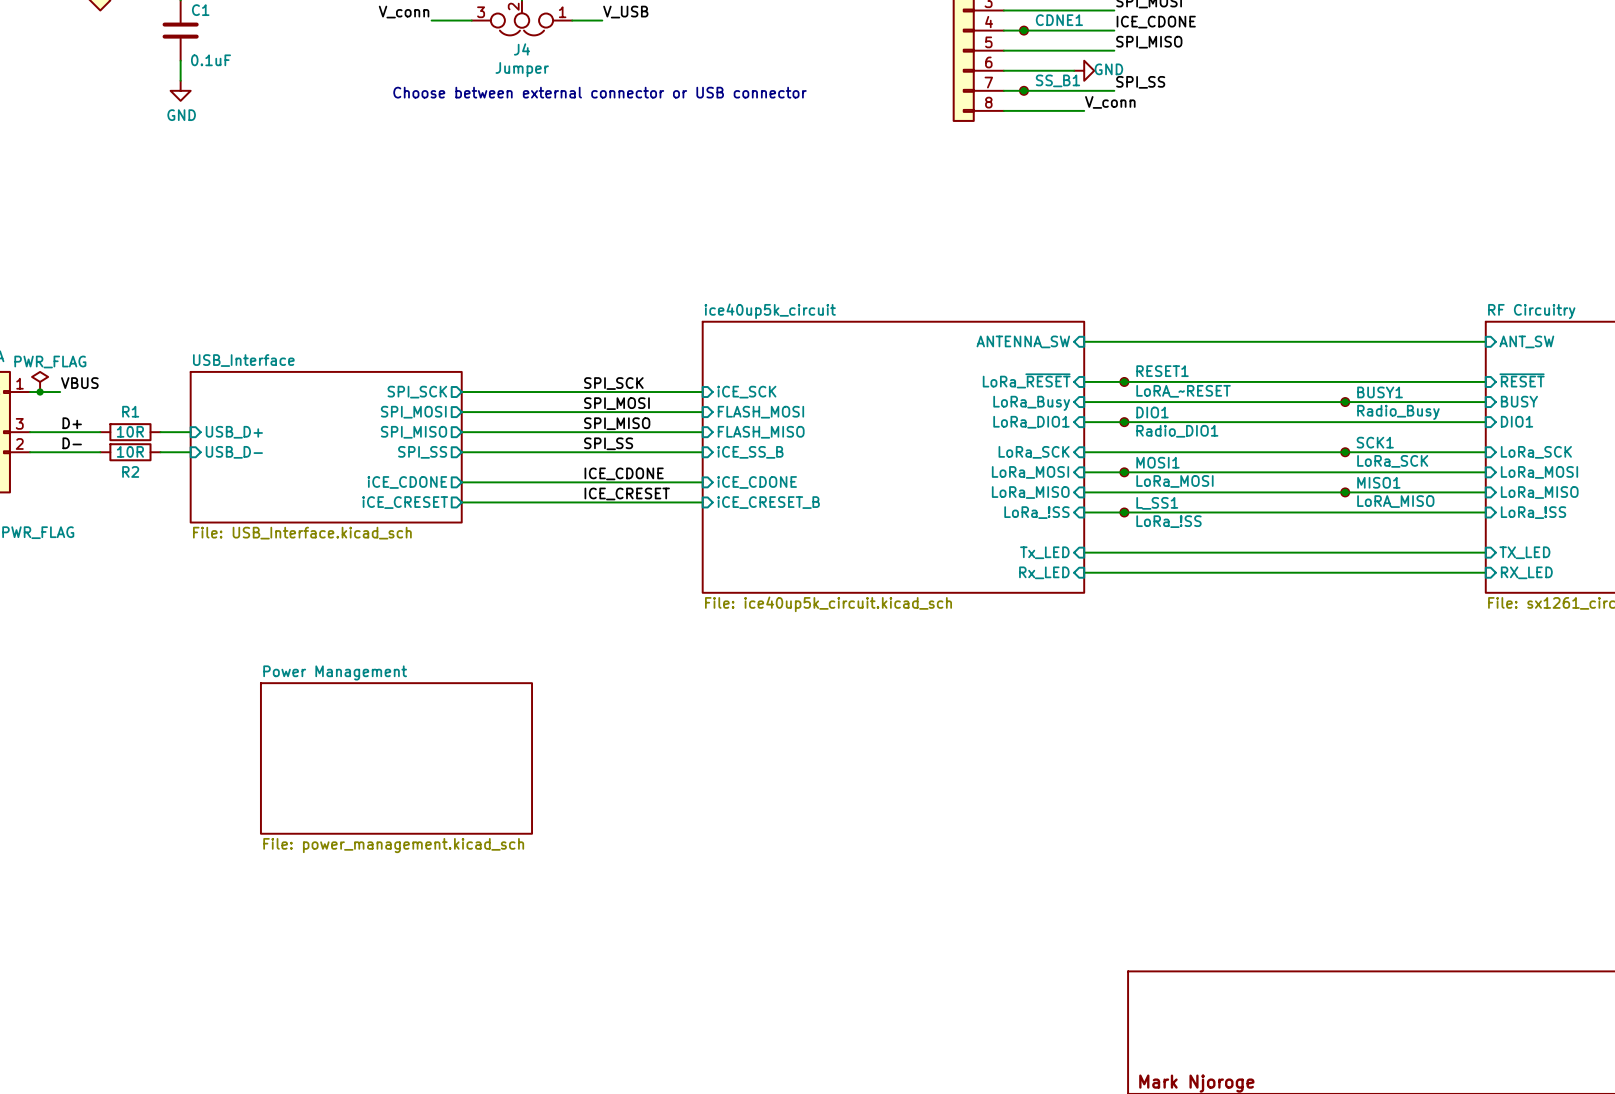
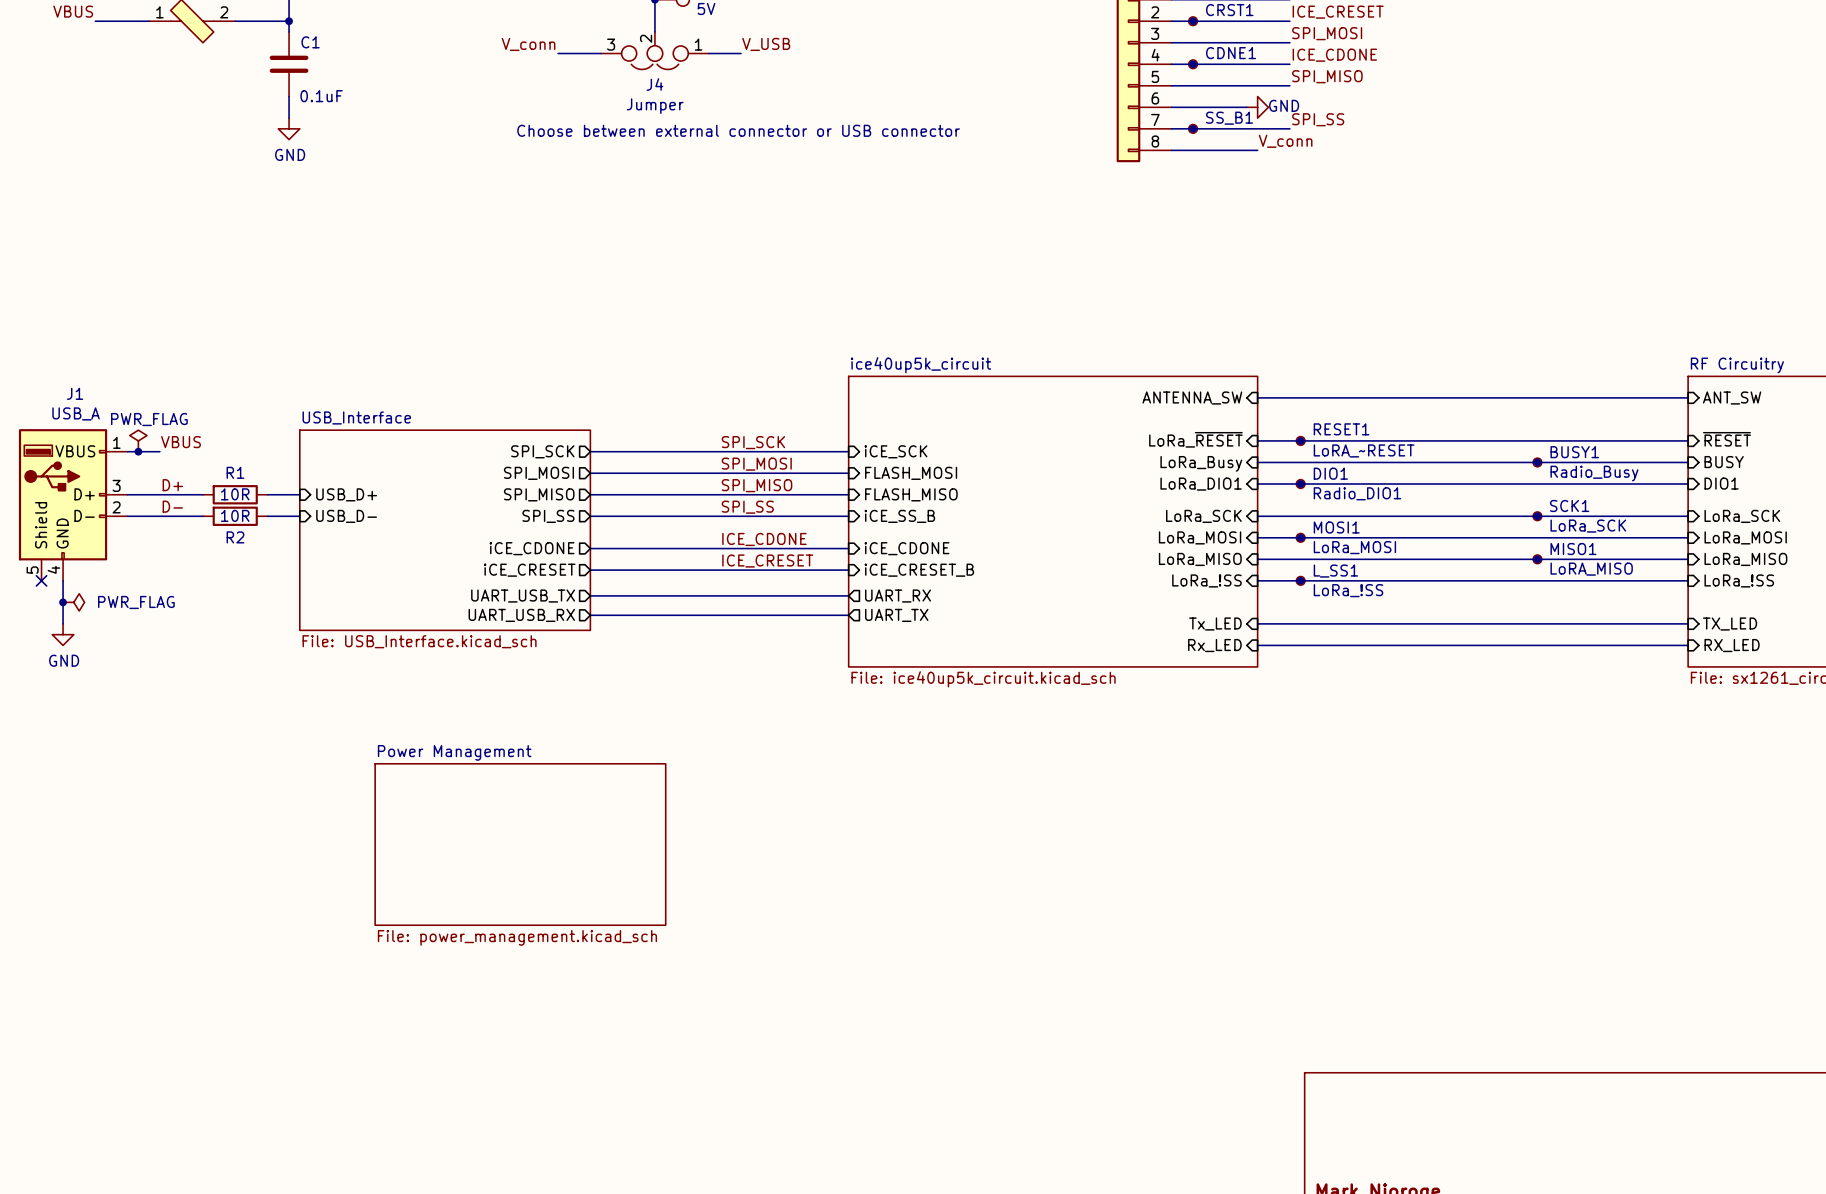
sheet USB_Interface: File: USB_Interface.kicad_sch (326, 447) -> none
sheet USB_Interface: none -> File: USB_Interface.kicad_sch (445, 530)
sheet pin: none -> UART_USB_TX (523, 596)
wire: none -> (590, 595) (848, 595)
sheet pin: none -> UART_RX (898, 596)
sheet pin: none -> UART_USB_RX (521, 615)
wire: none -> (590, 615) (848, 615)
sheet pin: none -> UART_TX (896, 615)

